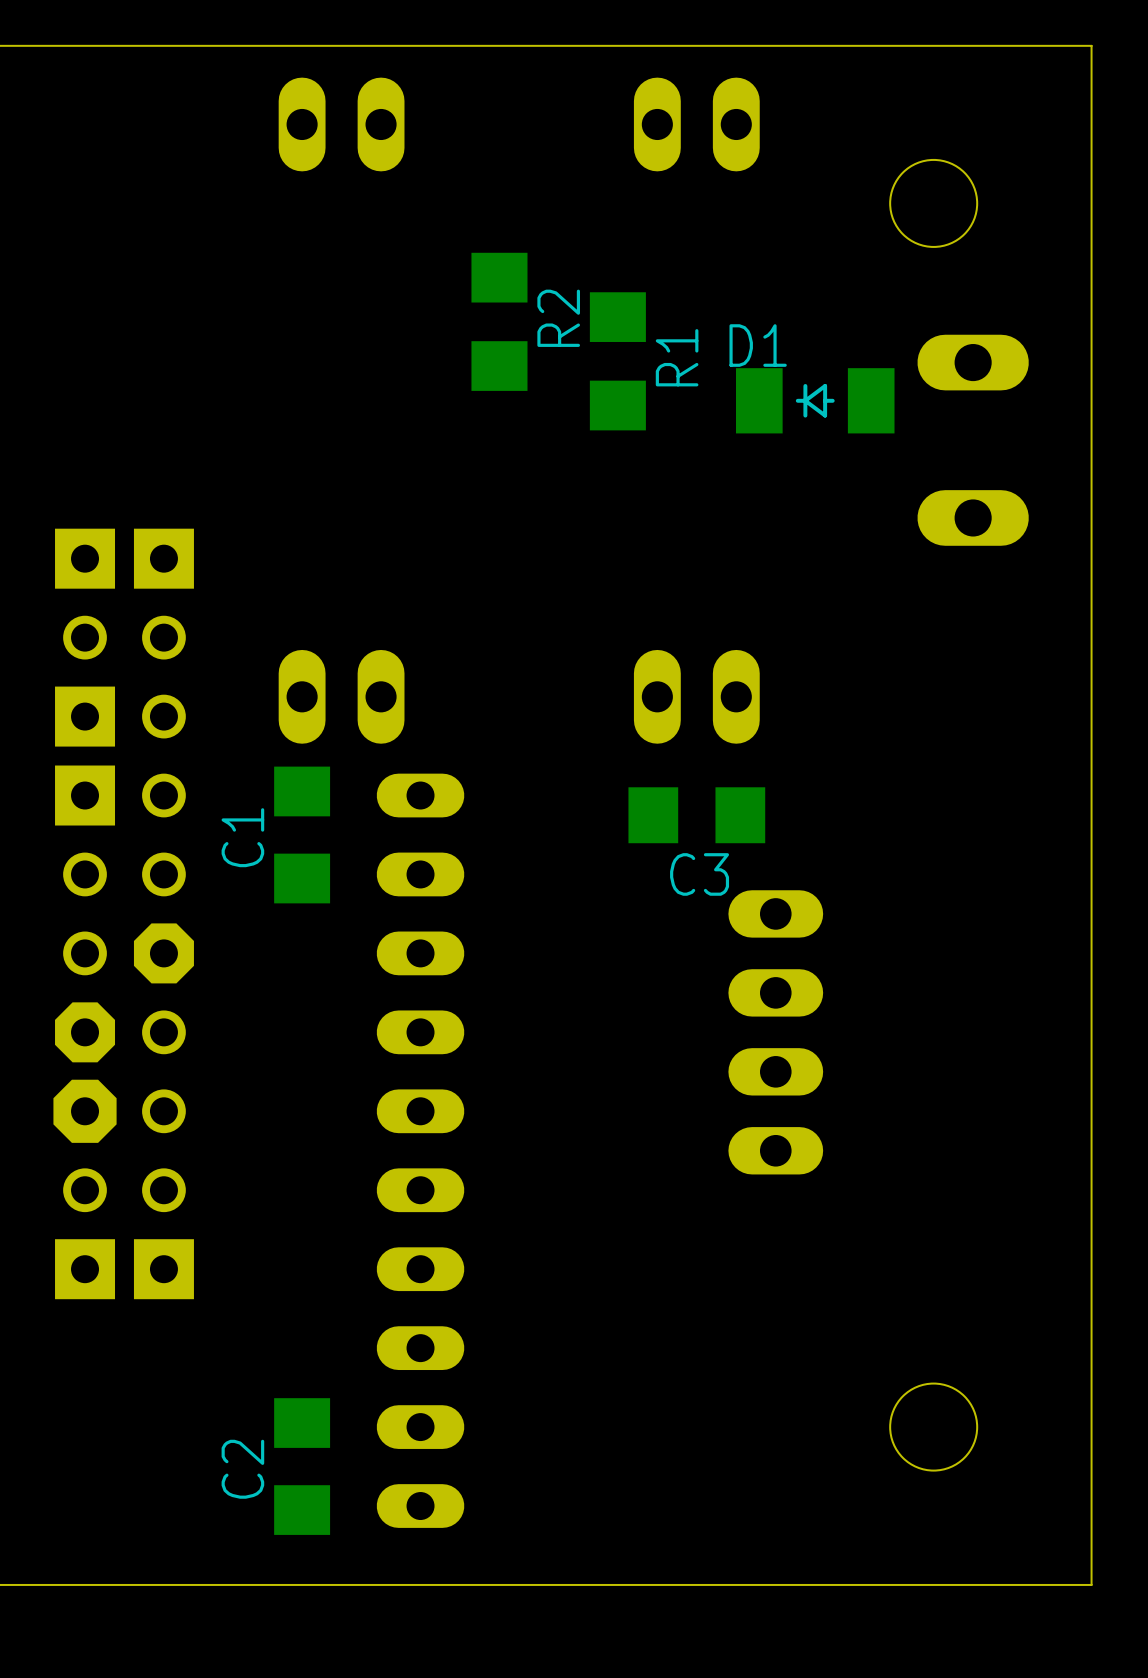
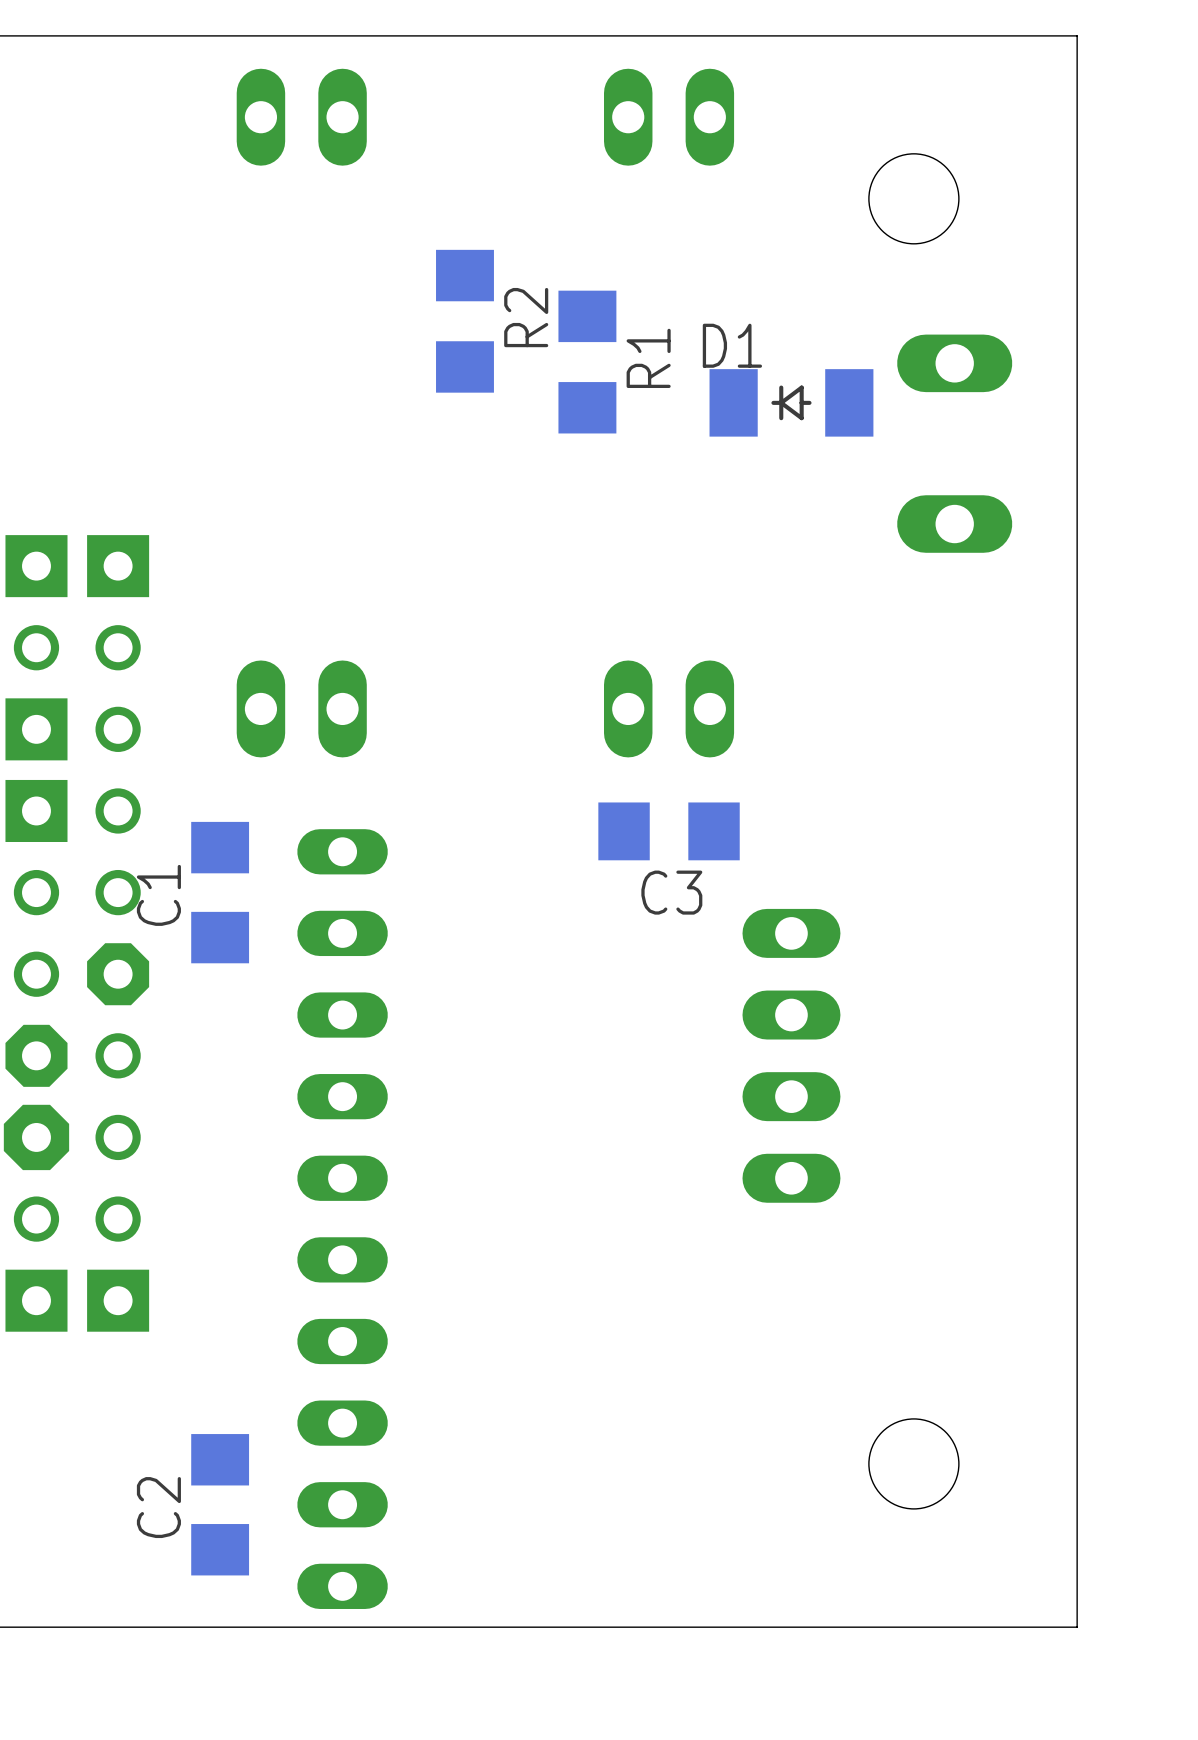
C1 position: (302, 834) -> (220, 892)
part position: (775, 1032) -> (791, 1055)
part position: (420, 1150) -> (342, 1219)
C2 position: (302, 1466) -> (220, 1504)

